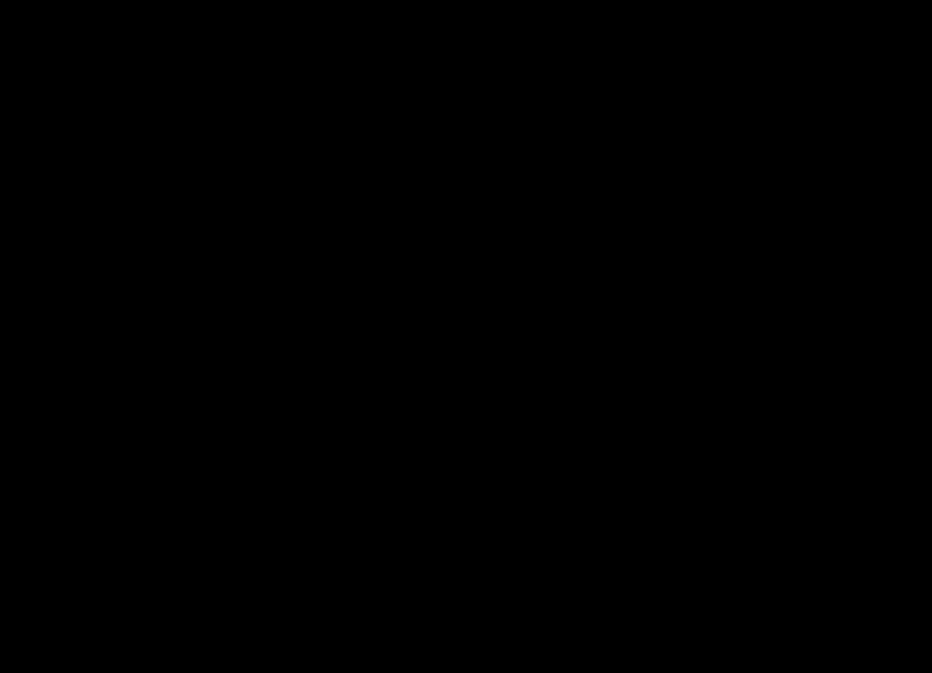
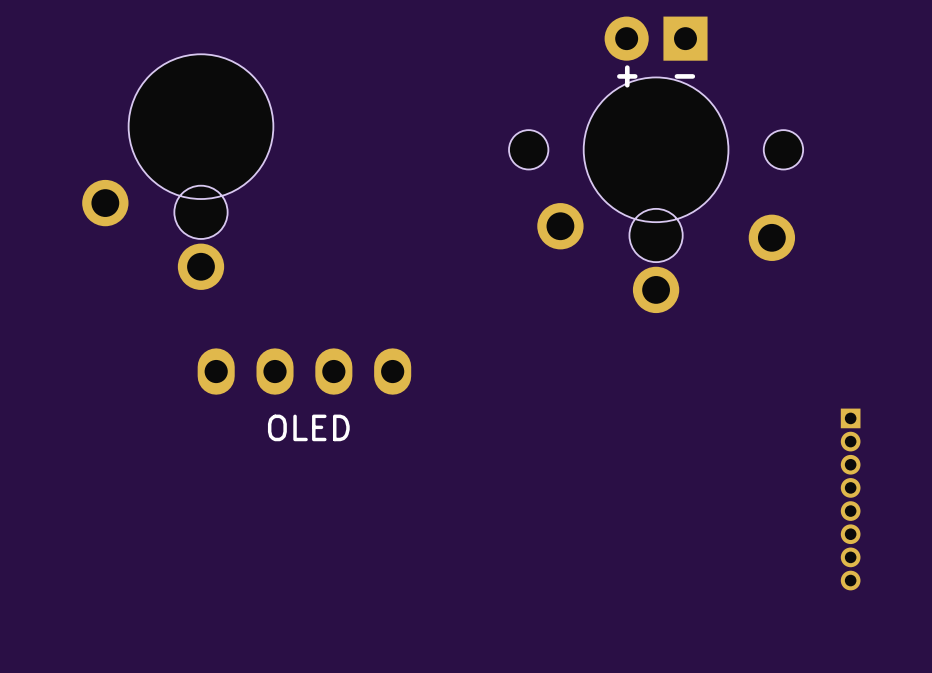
part: none -> (656, 164)
part: none -> (177, 172)
part: none -> (304, 371)
part: none -> (850, 499)

